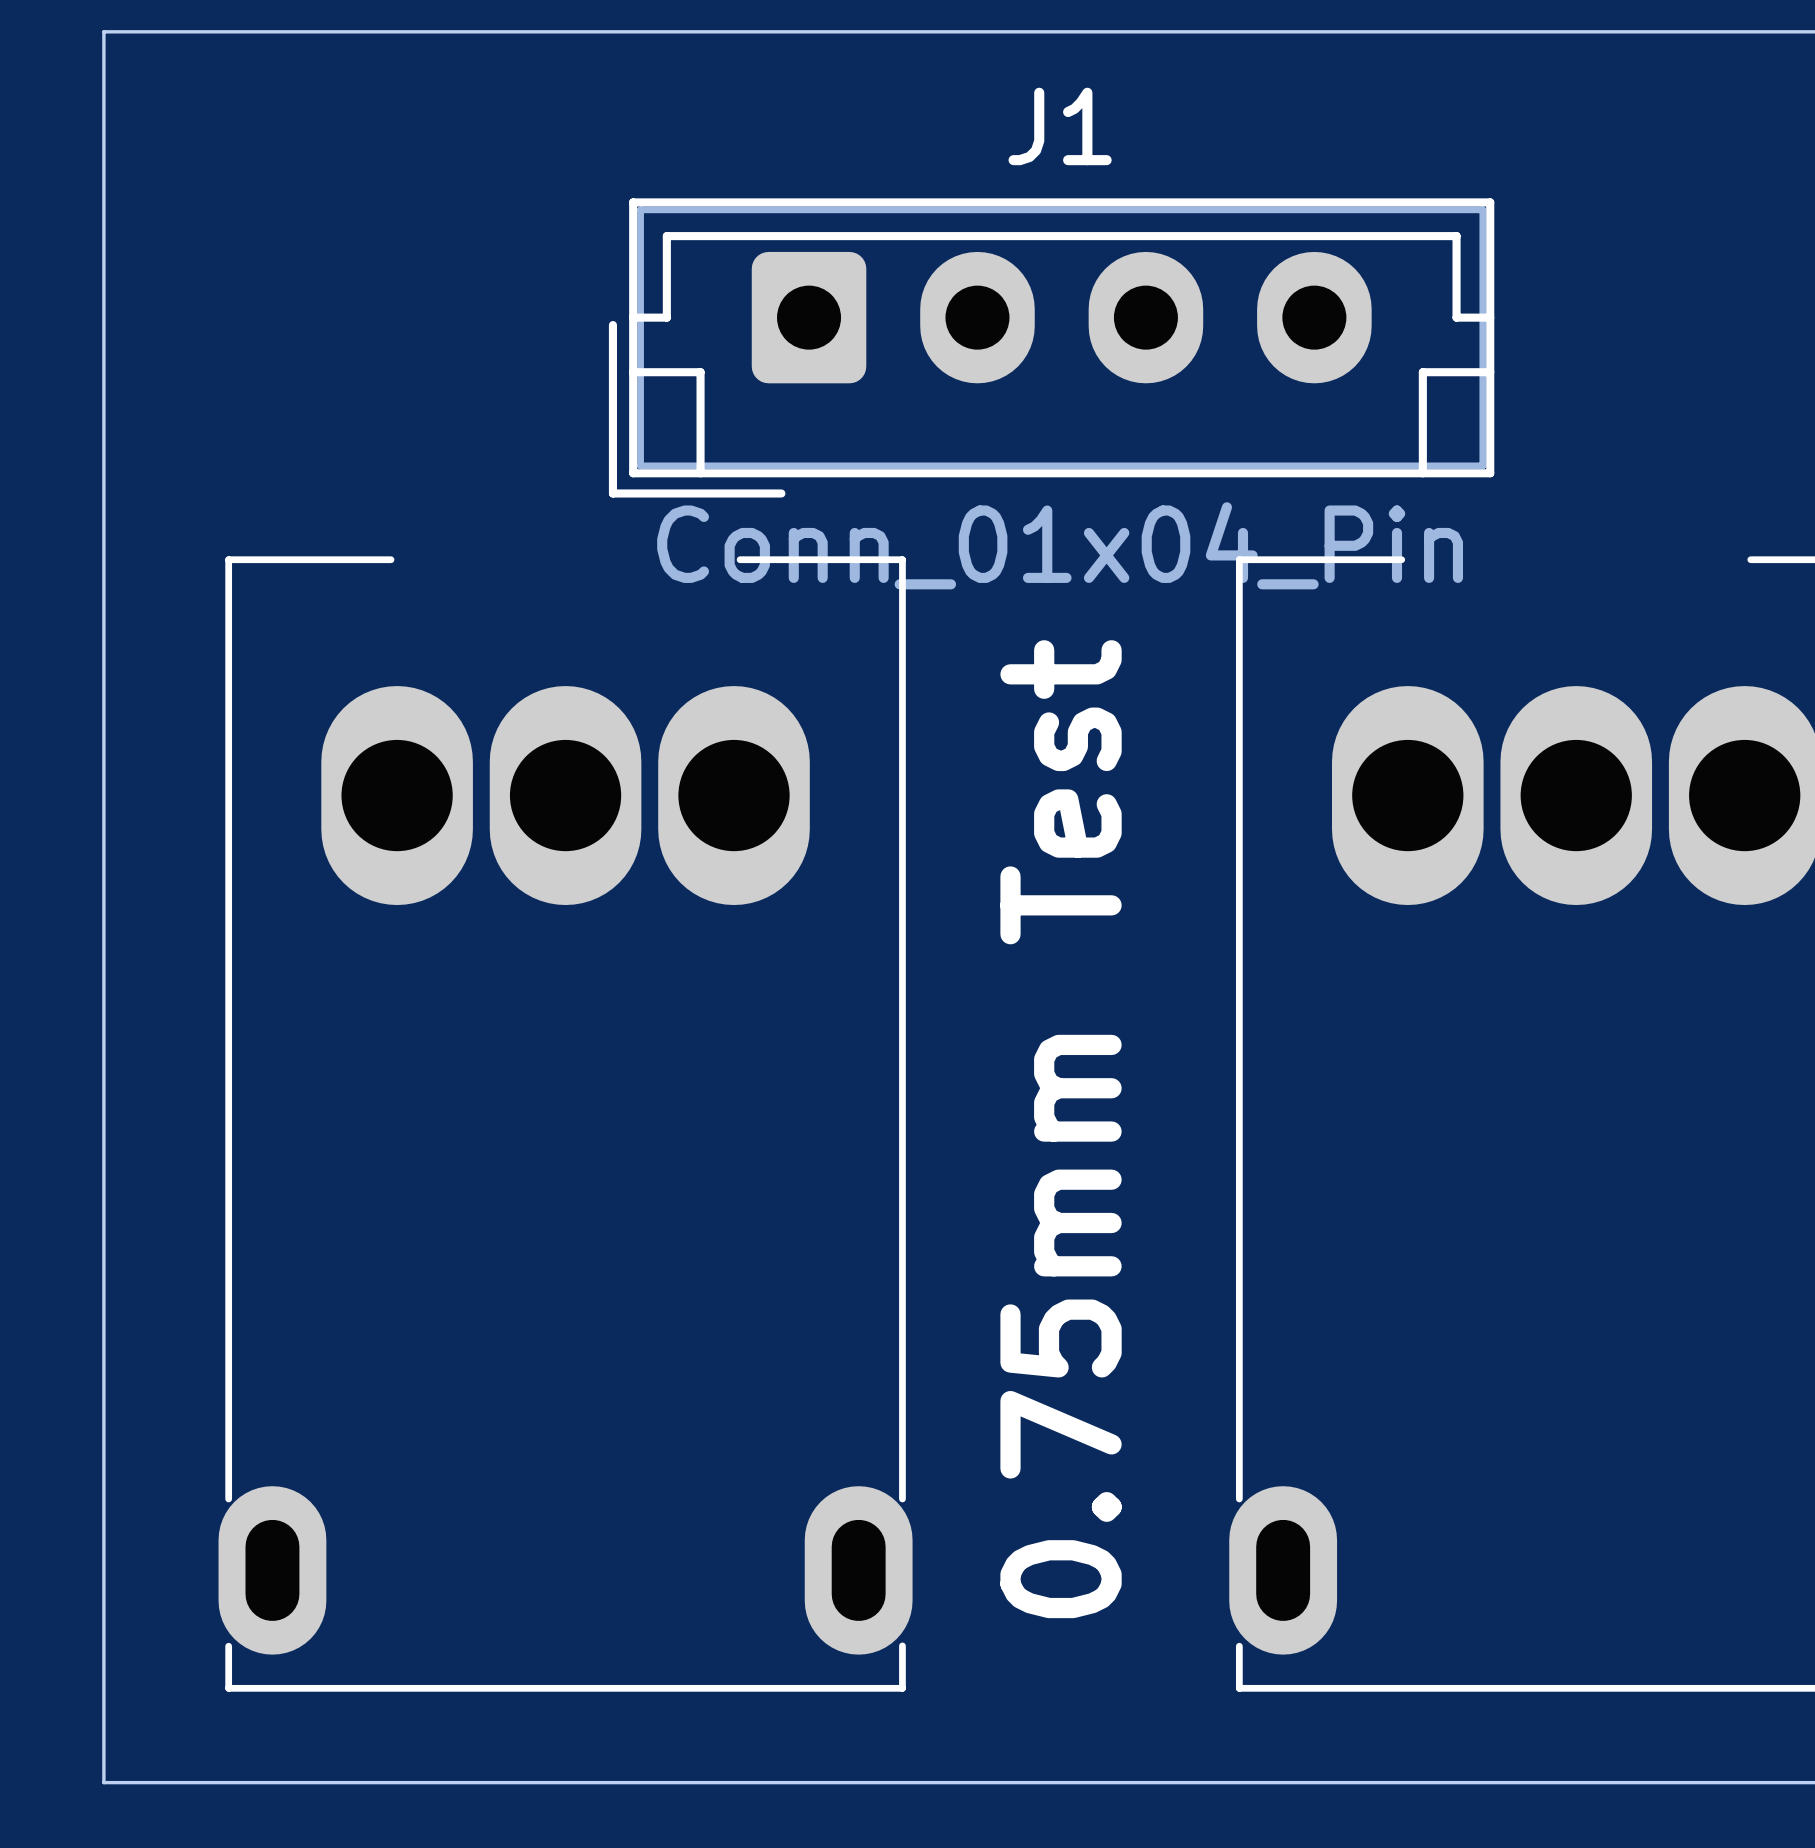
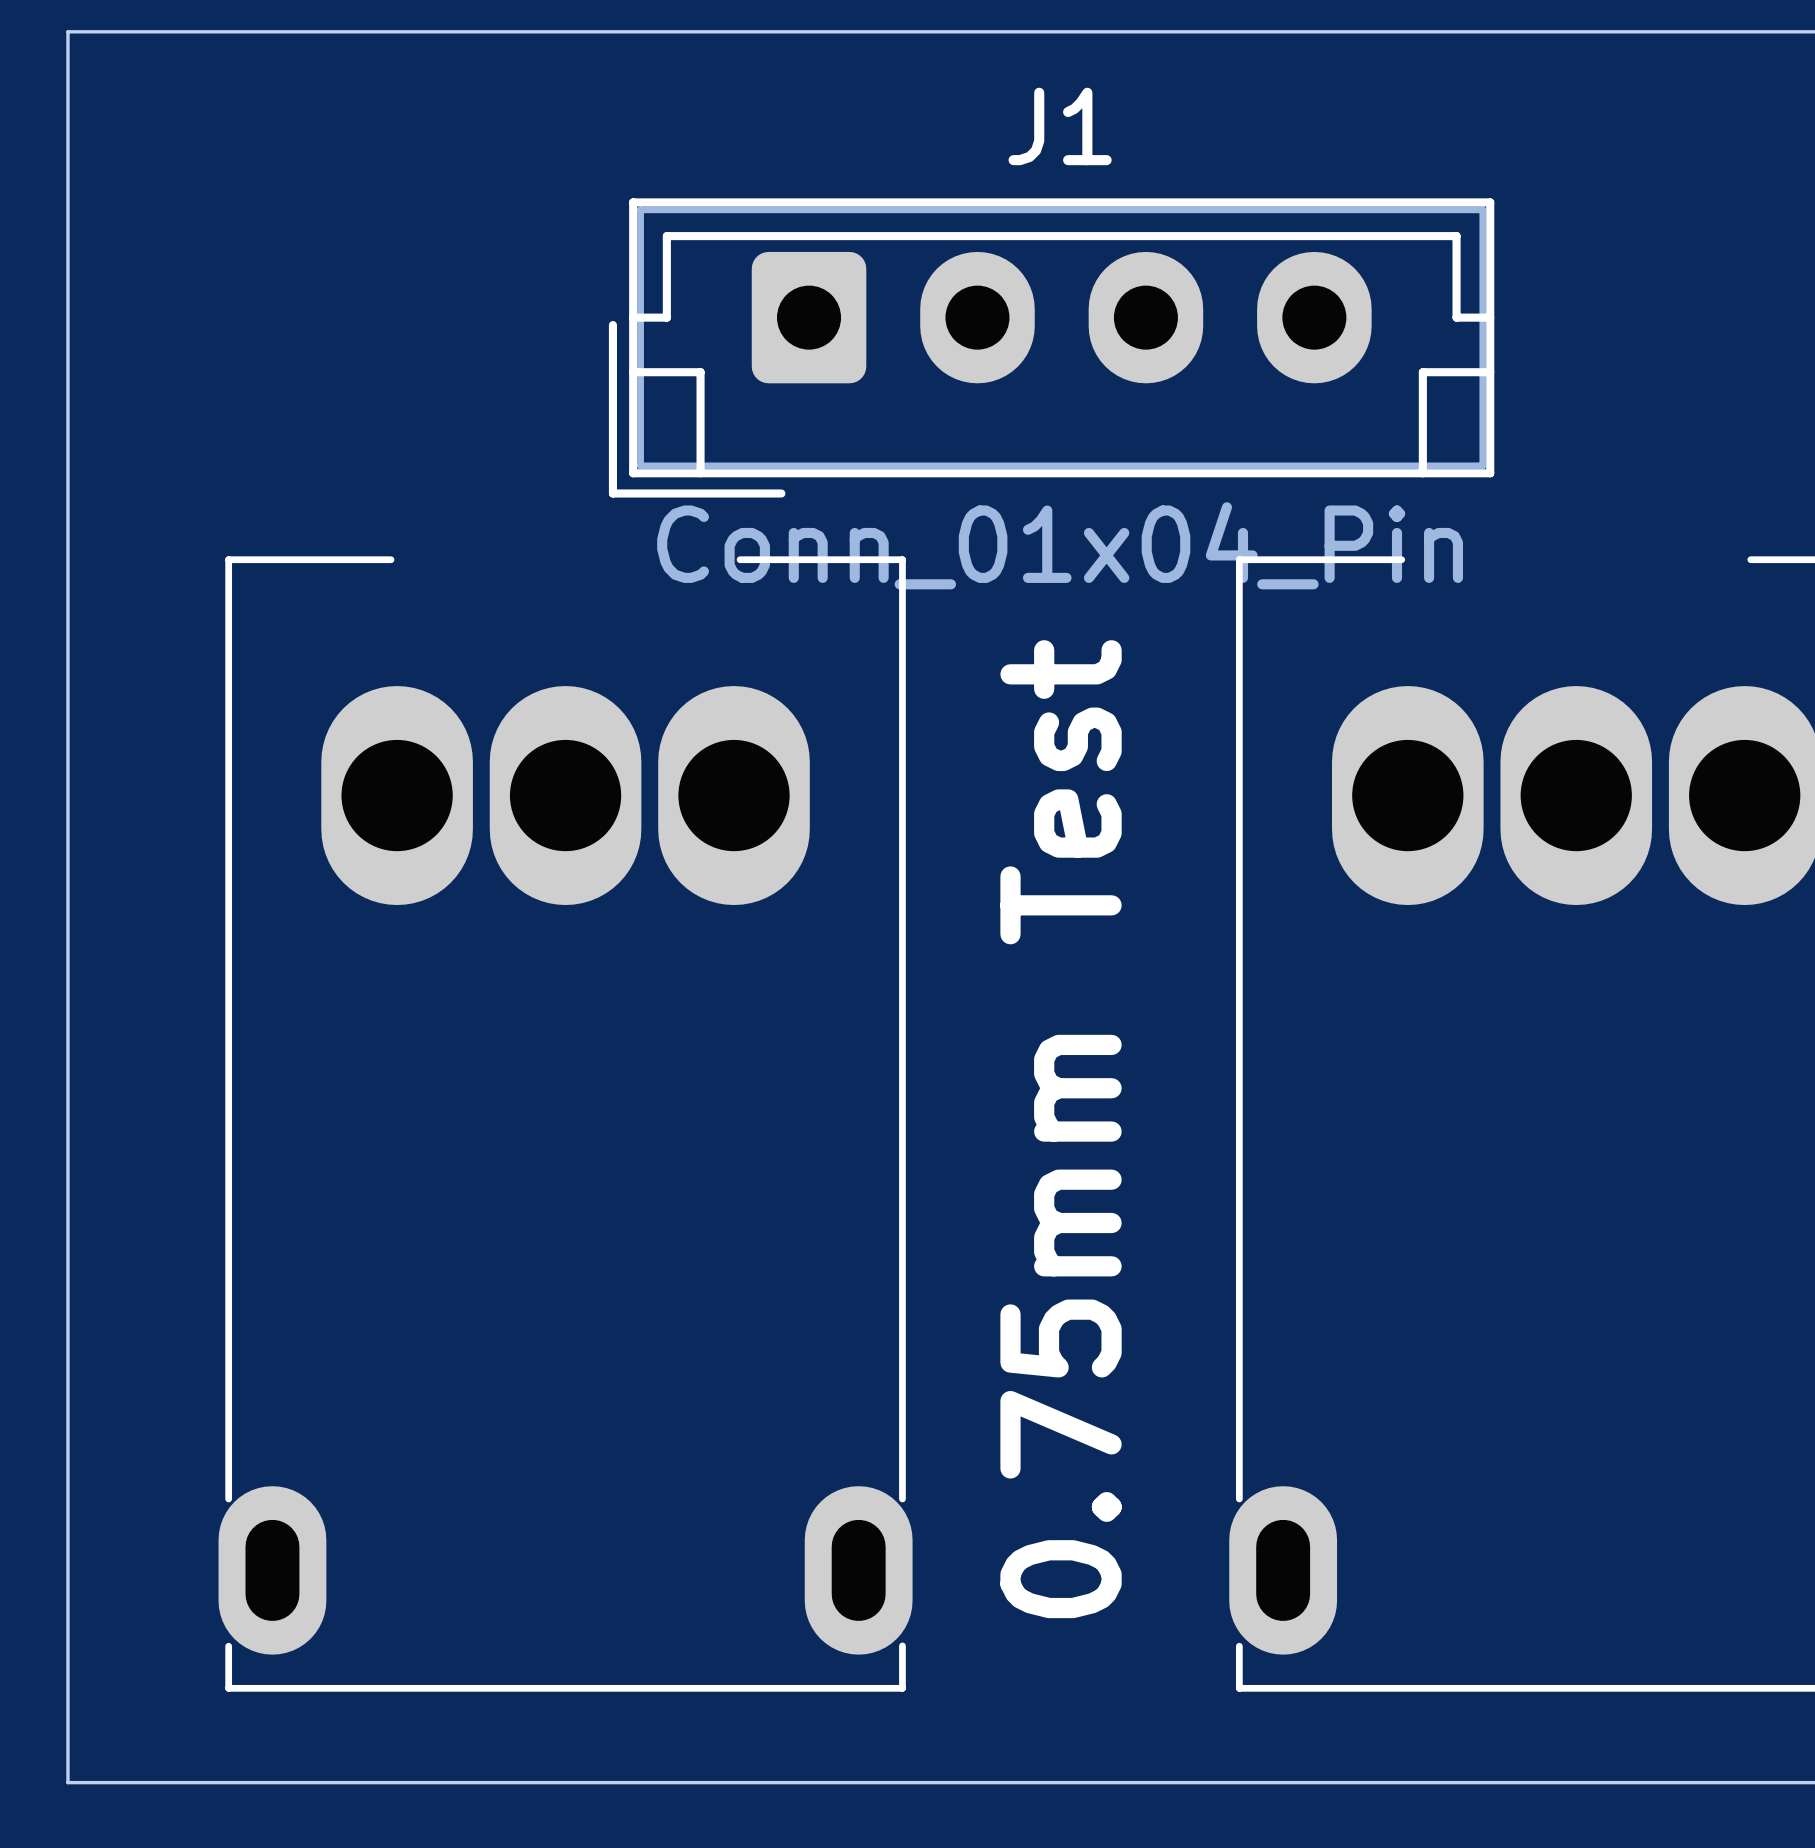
board edge: (103, 31) (103, 1782) -> (103, 31) (67, 31) (67, 1782) (103, 1782)

